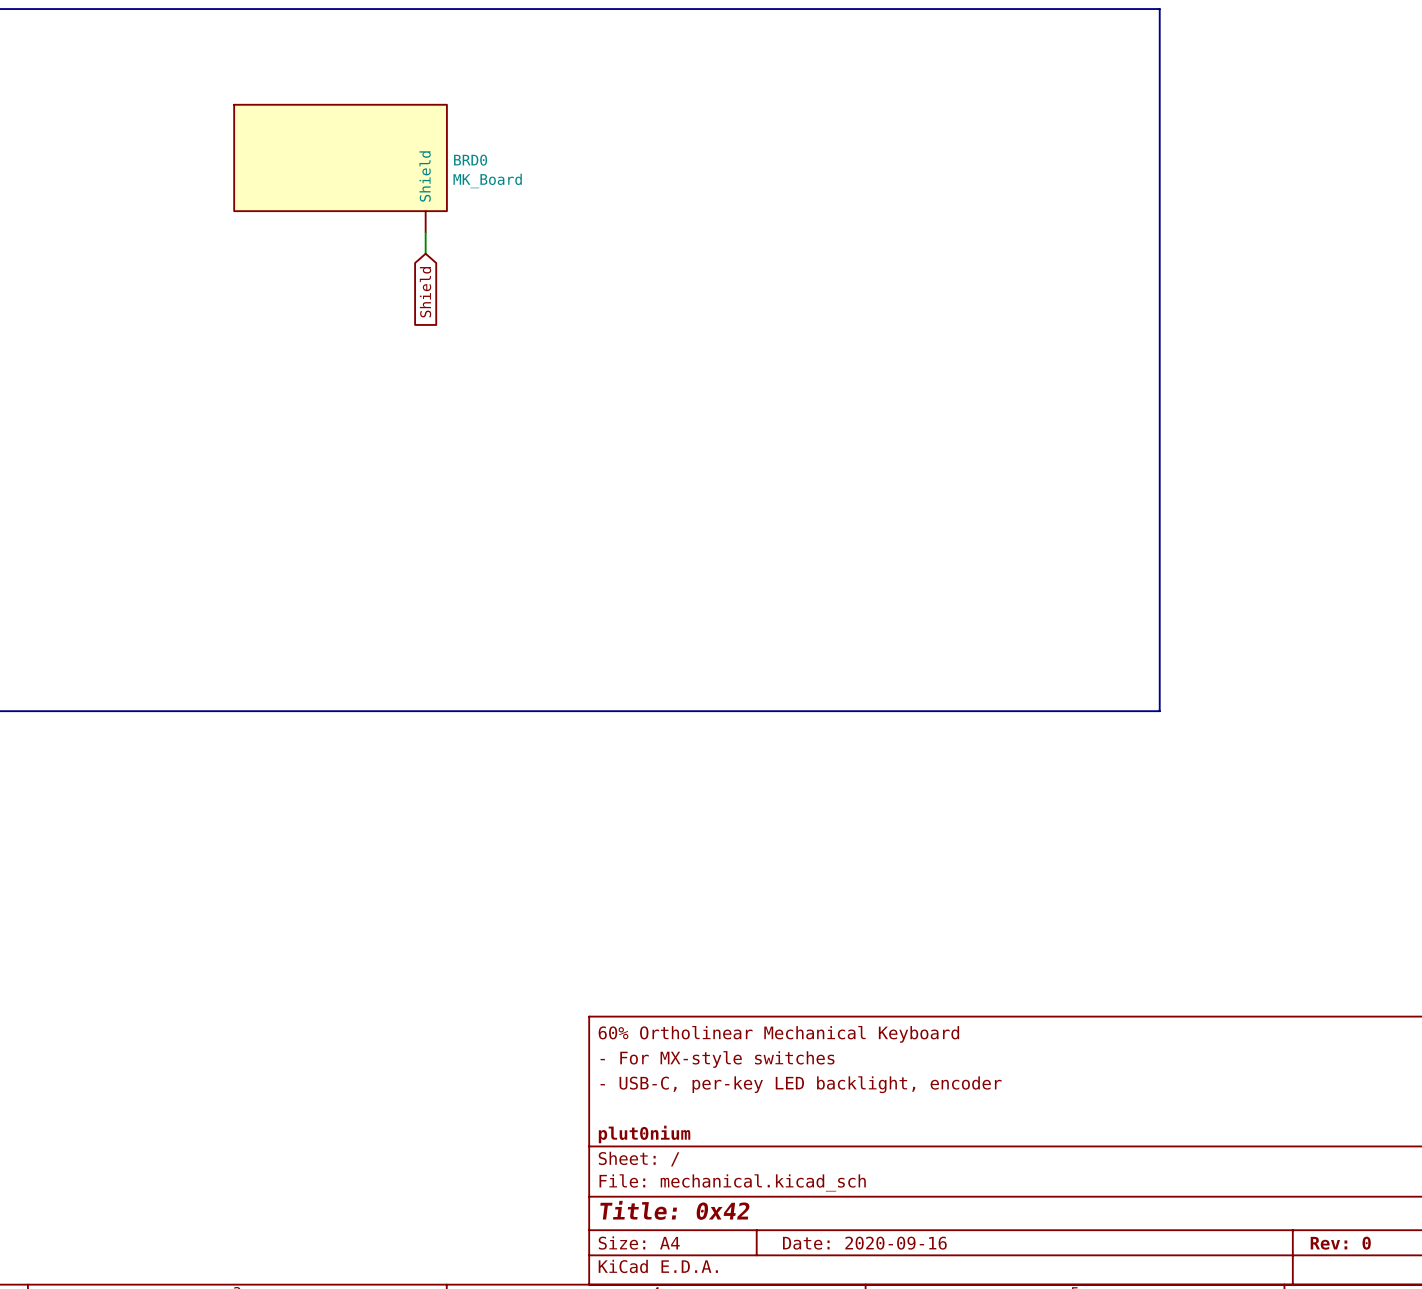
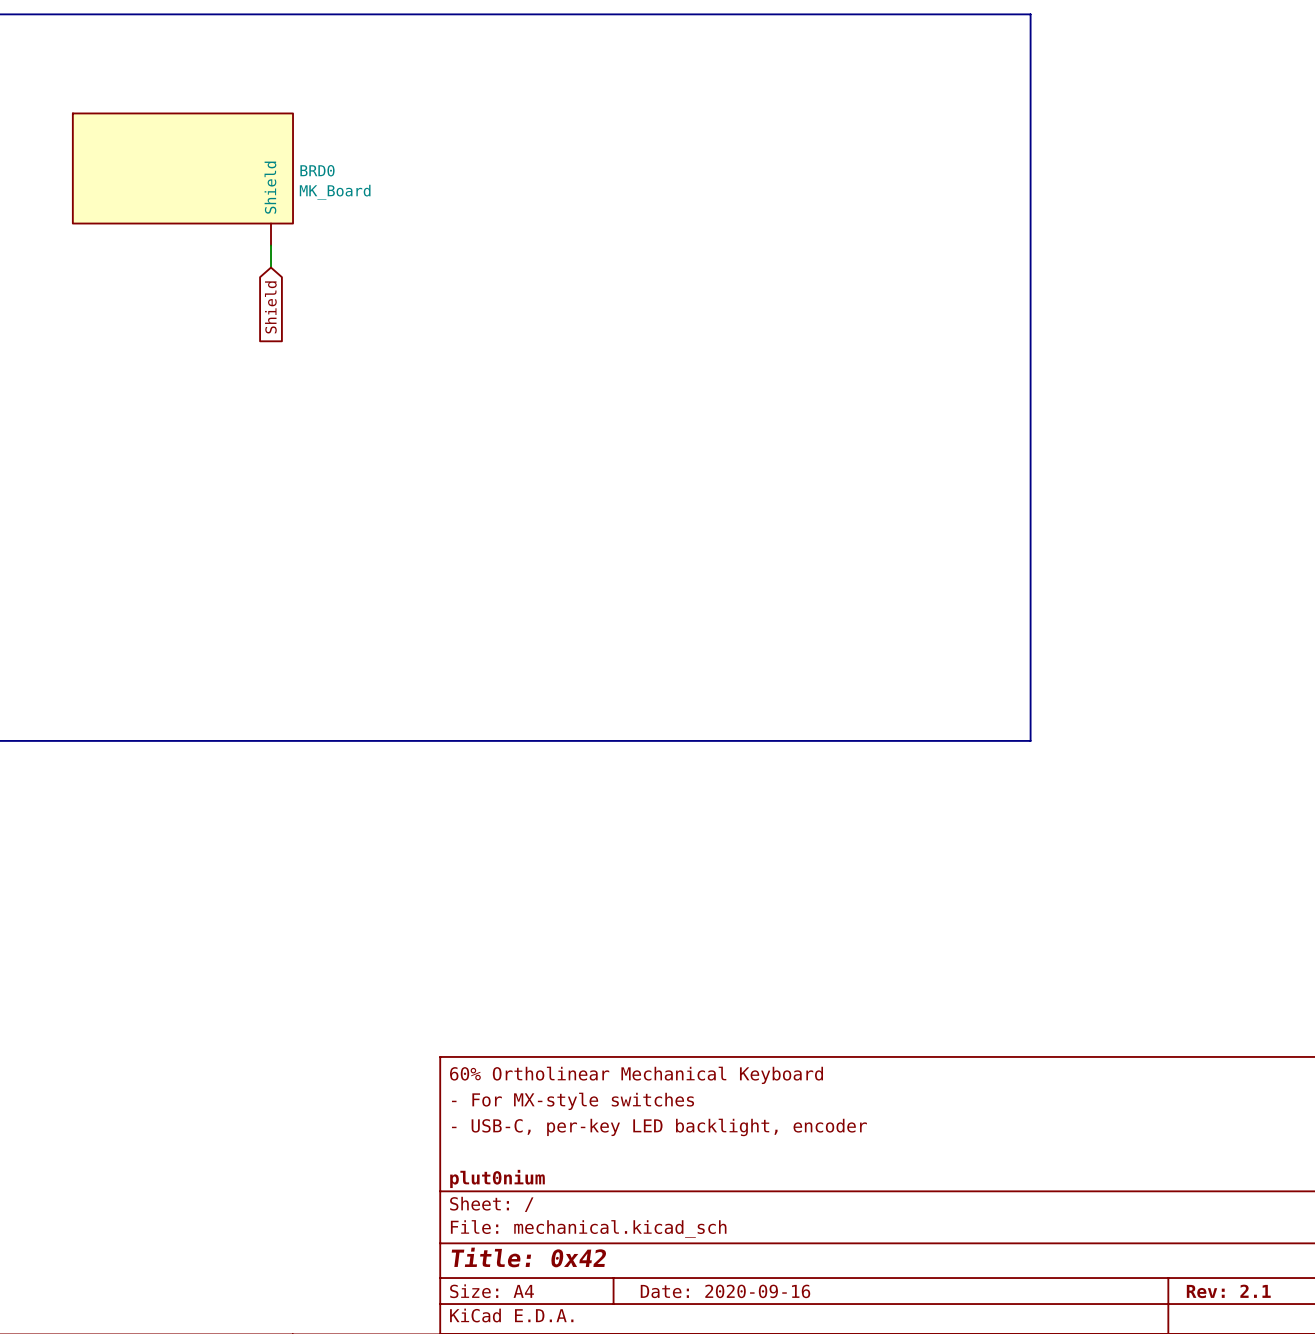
title block: Rev: 0 (1340, 1243) -> Rev: 2.1 (1228, 1291)

